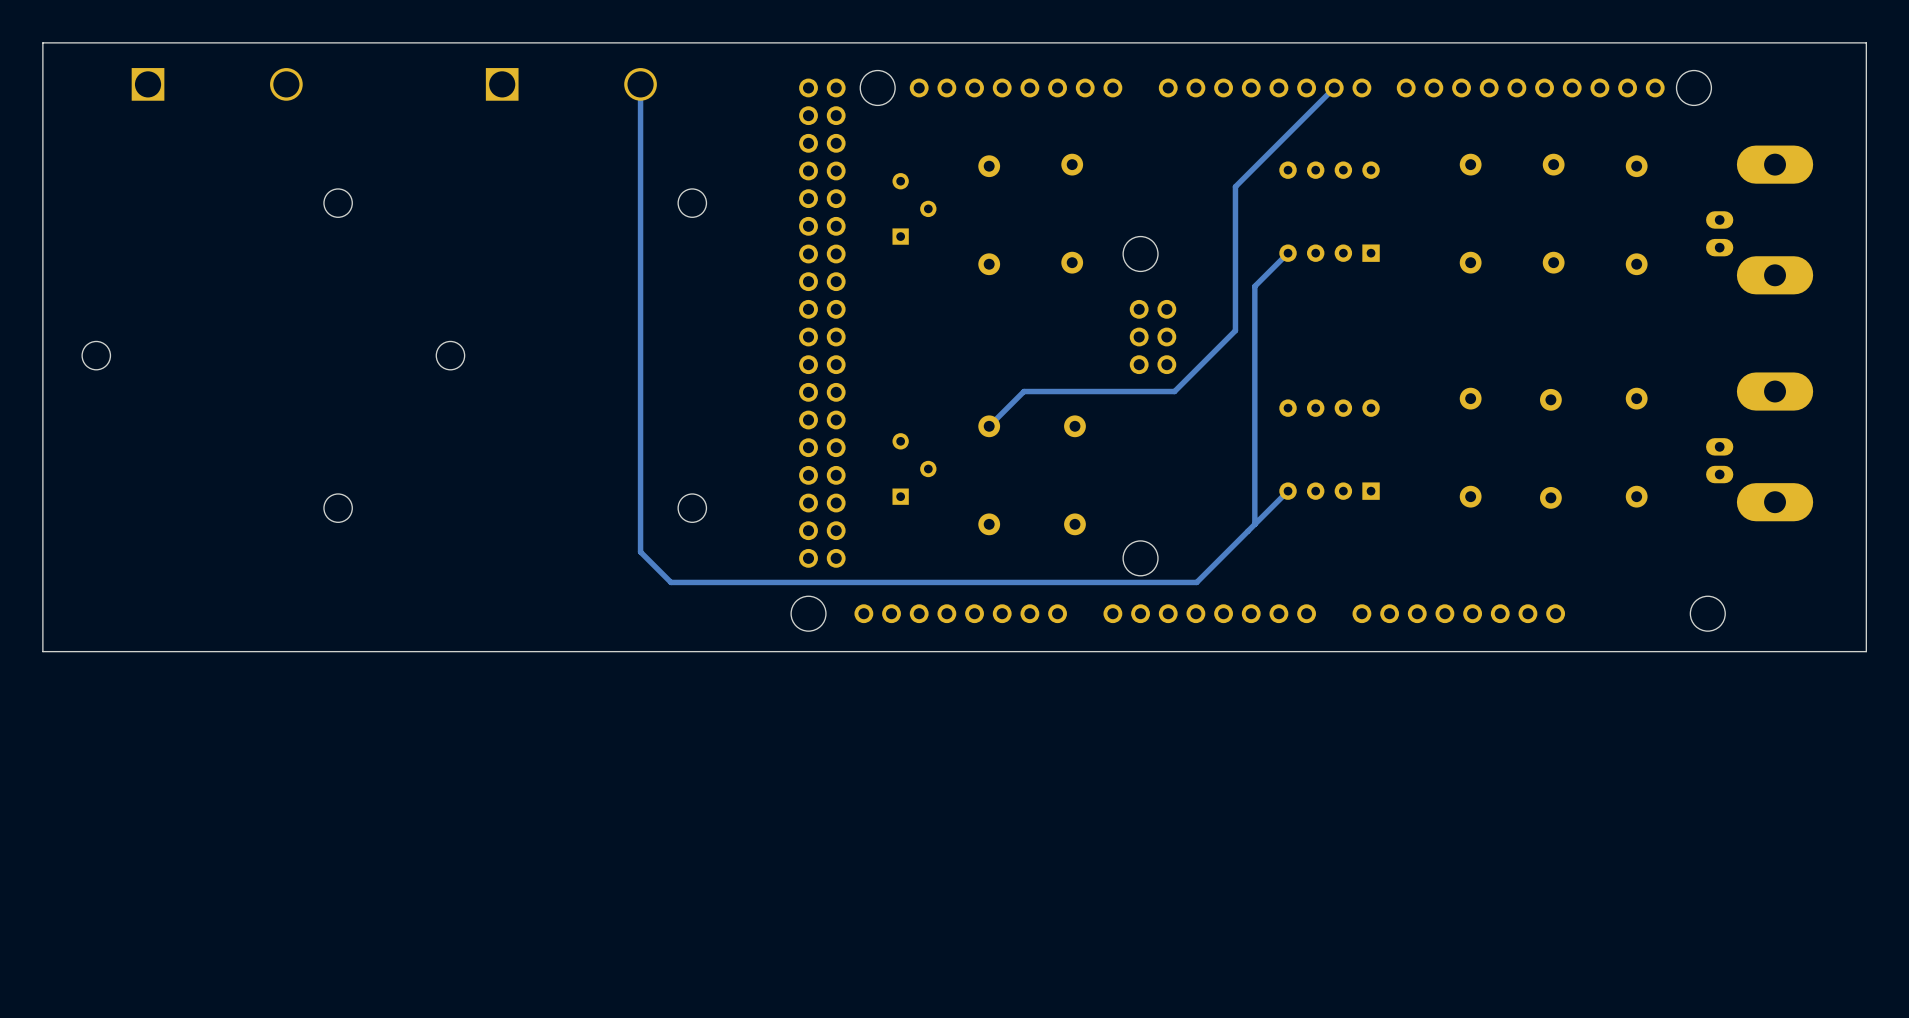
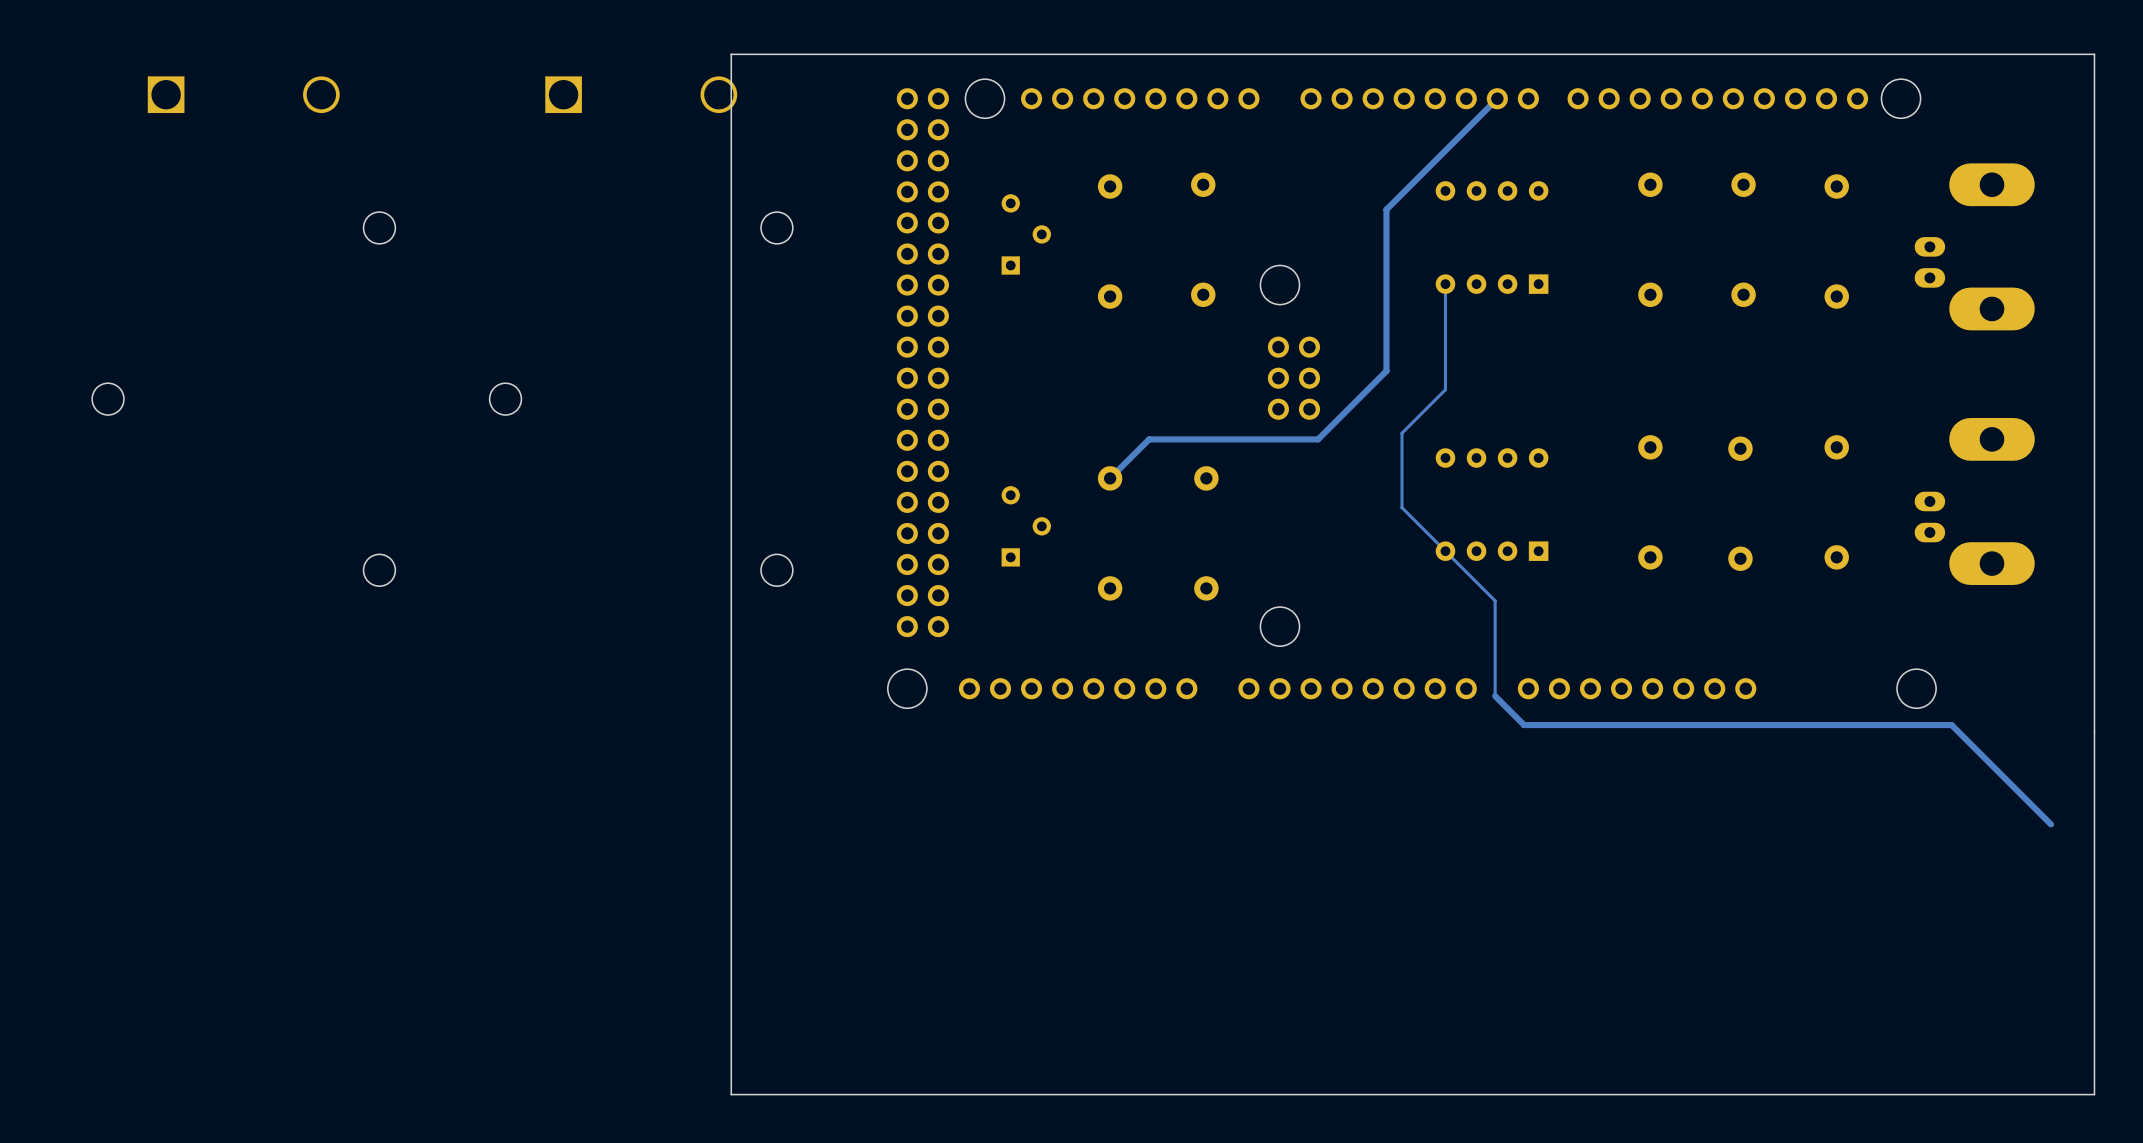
board edge: (1866, 48) (1866, 42) (42, 42) (42, 651) (1866, 651) -> (2094, 54) (731, 54) (731, 1094) (2094, 1094) (2094, 731)
track: (640, 84) (640, 552) (670, 582) (1196, 582) (1288, 491) -> none
track: (1288, 253) (1254, 286) (1254, 524) -> (1445, 284) (1445, 389) (1402, 433) (1402, 507) (1495, 600) (1495, 696) (1524, 725) (1951, 725) (2051, 824)

